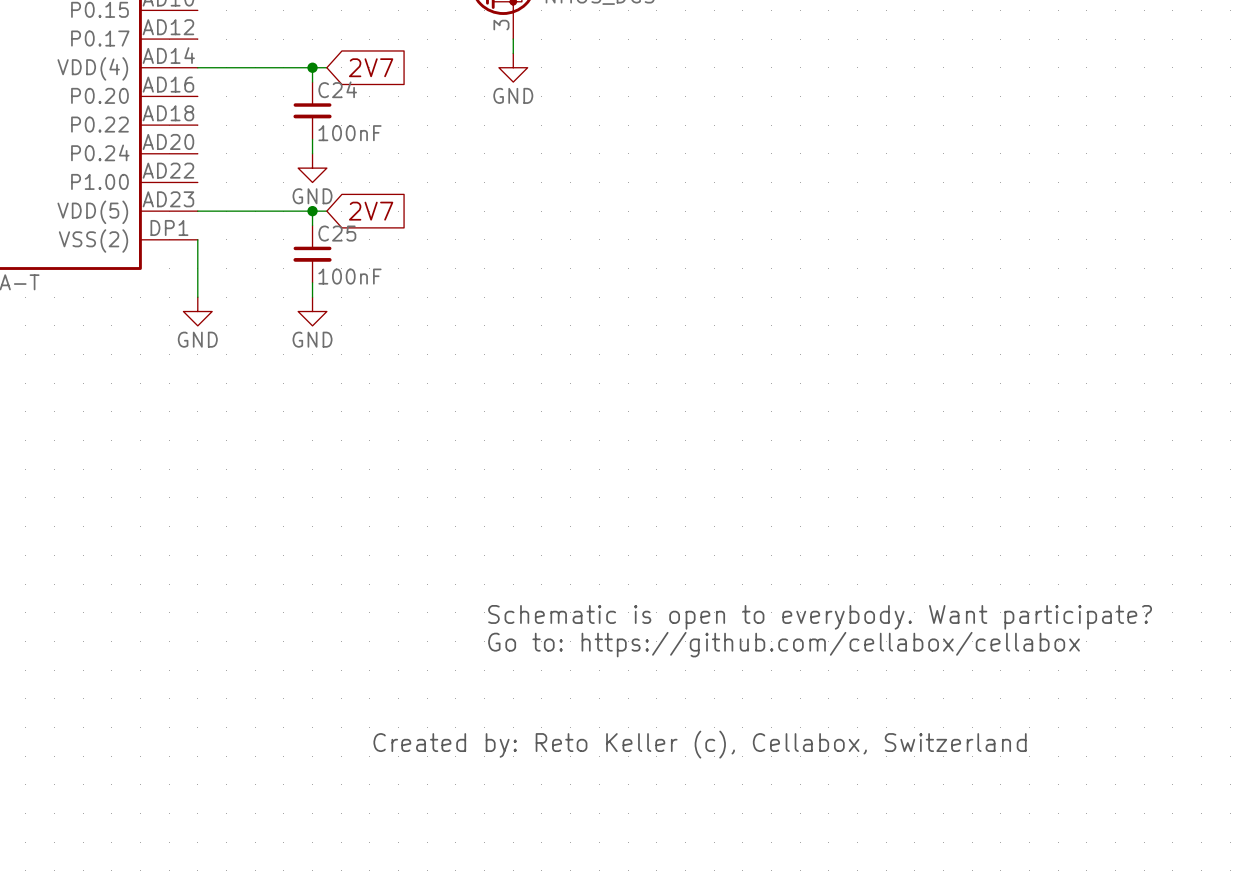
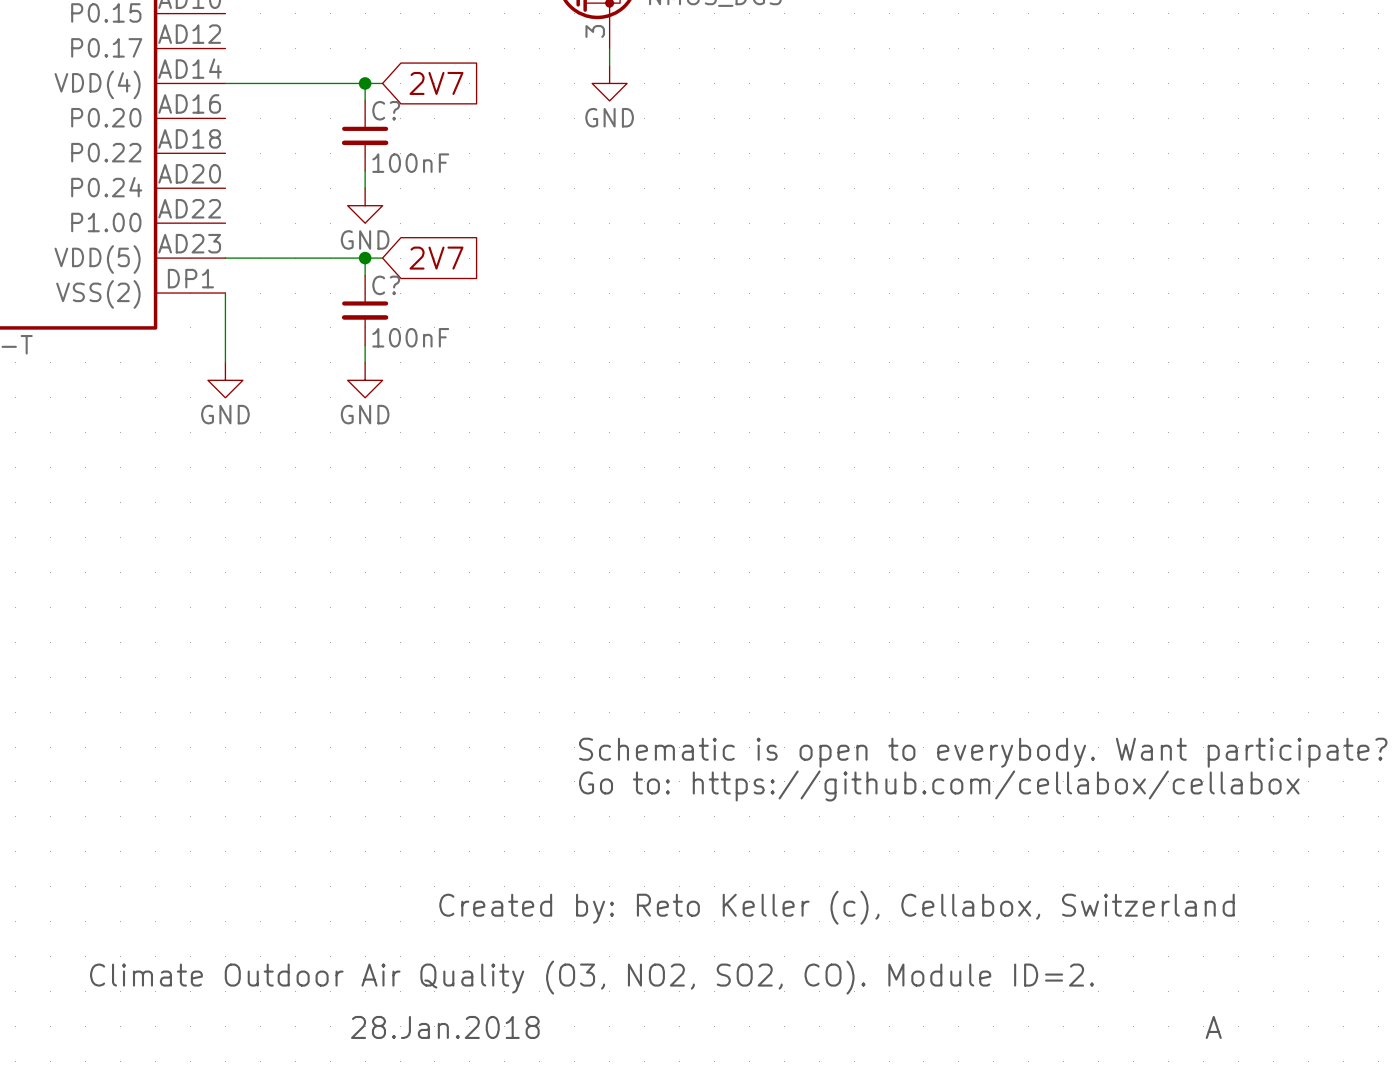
C24 name: C24 (337, 89) -> C? (386, 110)
C25 name: C25 (337, 233) -> C? (386, 285)
text: none -> Climate Outdoor Air Quality (O3, NO2, SO2, CO). Module ID=2. (592, 977)
text: none -> 28.Jan.2018 (445, 1027)
text: none -> A (1213, 1027)

